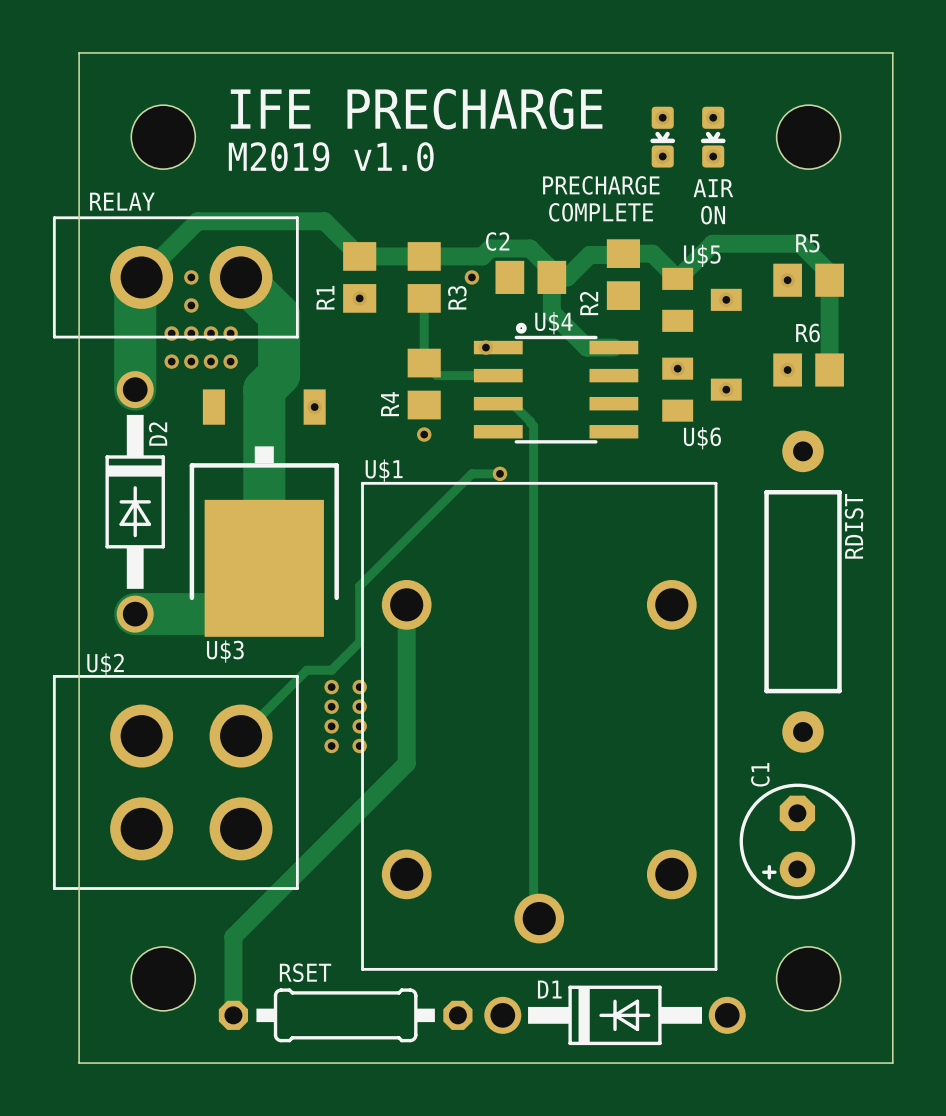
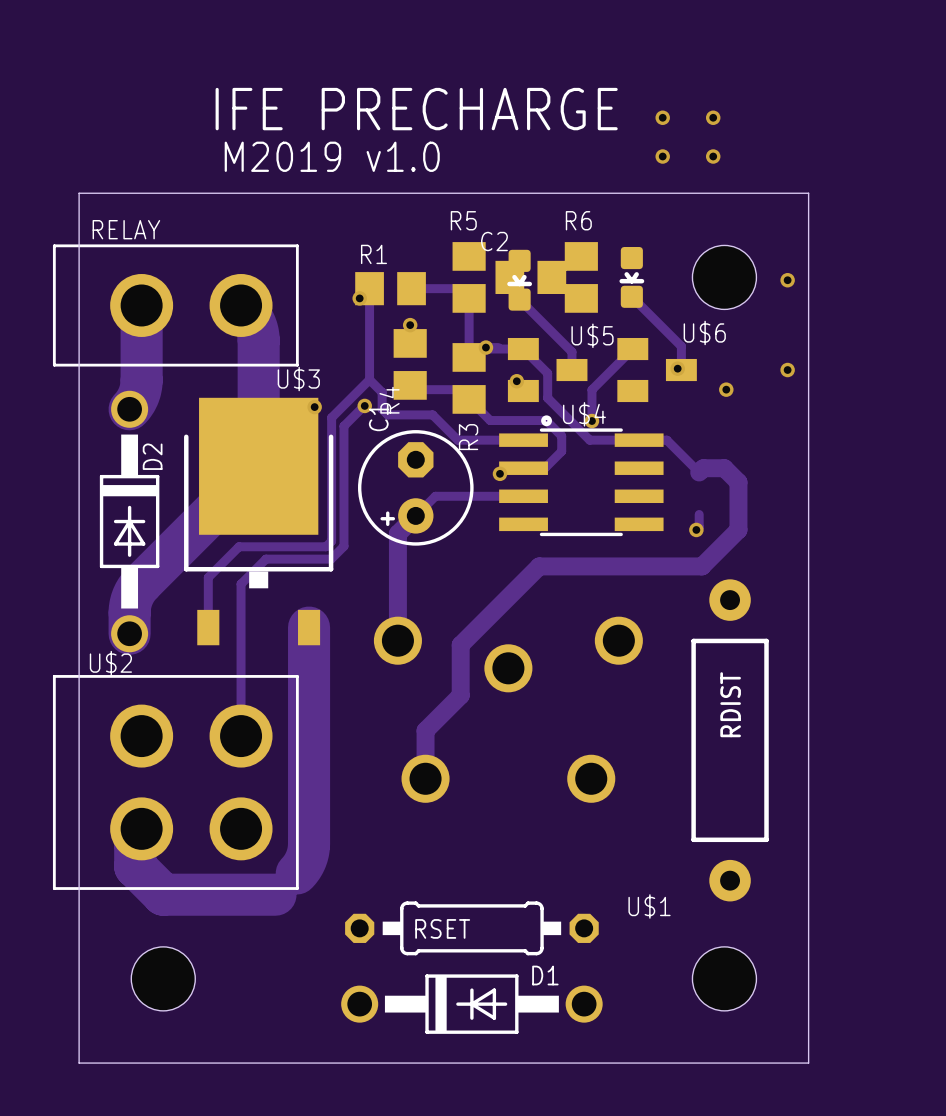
hole: (163, 137) -> none
part: (662, 137) -> none
part: (713, 137) -> none
hole position: (808, 137) -> (724, 277)
text: PRECHARGE (601, 185) -> none
text: AIR (713, 188) -> none
board edge: (79, 193) (79, 52) (892, 52) (892, 1063) (808, 1063) -> (79, 193) (808, 193) (808, 1063)
text: COMPLETE (601, 212) -> none
text: ON (713, 215) -> none
U$5 name position: U$5 (702, 255) -> U$5 (592, 335)
R2: (623, 274) -> none
RELAY position: (175, 277) -> (175, 305)
via: (191, 277) -> none
track: (241, 277) (279, 315) (279, 374) (264, 389) (264, 568) (246, 614) (135, 614) -> none
R1 rotation: 0° (359, 277) -> 90° clockwise (390, 288)
R3 position: (424, 277) -> (469, 378)
via: (471, 277) -> none
track: (551, 277) (551, 312) (586, 347) (613, 347) -> none
track: (551, 277) (547, 273) (547, 266) (529, 248) (490, 248) (482, 256) (359, 256) (324, 221) (197, 221) (135, 283) (135, 389) -> none
track: (551, 277) (567, 277) (589, 254) (652, 253) (677, 278) (712, 243) (800, 243) (829, 273) (829, 370) -> none
part: none -> (631, 277)
part: none -> (519, 280)
R5 rotation: 0° (808, 280) -> 90° clockwise (469, 277)
R5 position: (808, 280) -> (469, 277)
track: none -> (369, 288) (369, 379)
track: none -> (411, 288) (459, 288) (469, 298) (469, 357) (477, 349) (523, 349) (547, 373) (547, 398) (589, 440) (666, 440) (699, 472) (703, 468) (724, 468) (738, 482) (738, 529) (701, 566) (539, 566) (460, 644) (460, 695) (425, 730) (425, 778)
track: none -> (631, 296) (681, 346) (681, 370)
R3 name position: R3 (457, 297) -> R3 (468, 437)
track: (424, 298) (424, 363) (436, 375) (498, 375) -> none
track: none -> (519, 299) (571, 351) (571, 370)
U$5 position: (701, 299) -> (547, 370)
track: none -> (141, 305) (141, 385) (138, 395) (129, 409)
via: (191, 305) -> none
track: none -> (241, 305) (253, 320) (258, 336) (258, 466) (139, 586) (130, 604) (129, 633)
via: none -> (410, 325)
via: (171, 333) -> none
via: (191, 333) -> none
via: (210, 333) -> none
via: (230, 333) -> none
track: none -> (632, 349) (591, 389) (591, 421)
via: (171, 361) -> none
via: (191, 361) -> none
via: (210, 361) -> none
via: (230, 361) -> none
R6 rotation: 0° (808, 370) -> 90° clockwise (581, 277)
R6 position: (808, 370) -> (581, 277)
track: none -> (369, 379) (331, 417) (331, 541) (326, 546) (239, 546) (208, 577) (208, 627)
track: none -> (369, 379) (382, 392) (382, 409) (387, 414) (432, 414) (457, 440) (523, 440)
via: none -> (516, 381)
U$4 position: (556, 383) -> (581, 475)
R4 position: (424, 384) -> (410, 364)
track: none -> (410, 385) (414, 389) (459, 389) (490, 420) (546, 420) (561, 436) (561, 451) (544, 468) (523, 468)
U$6 position: (701, 389) -> (657, 370)
track: (498, 403) (512, 403) (533, 426) (533, 912) (539, 918) -> none
via: none -> (364, 405)
via: none -> (591, 421)
via: (424, 434) -> none
U$6 name position: U$6 (702, 438) -> U$6 (704, 332)
U$1 name position: U$1 (384, 470) -> U$1 (649, 906)
track: (499, 473) (471, 473) (359, 586) (359, 642) (331, 670) (306, 670) (241, 736) -> (364, 405) (343, 426) (343, 546) (331, 559) (265, 559) (241, 584) (241, 736)
U$1 footprint: [361, 481, 718, 971] -> [373, 616, 643, 803]
track: none -> (523, 496) (435, 496) (397, 533) (397, 640)
D2 position: (135, 501) -> (129, 521)
U$3 rotation: 0° (264, 513) -> 180° (258, 521)
track: none -> (699, 514) (699, 527) (696, 529)
RDIST name position: RDIST (854, 526) -> RDIST (730, 704)
via: none -> (696, 529)
RDIST position: (803, 591) -> (730, 740)
track: (406, 604) (406, 763) (296, 873) -> (309, 627) (308, 847) (304, 863) (296, 873)
via: (331, 687) -> none
via: (359, 687) -> none
via: (331, 706) -> none
via: (359, 706) -> none
via: (331, 726) -> none
via: (359, 726) -> none
via: (331, 745) -> none
via: (359, 745) -> none
C1 position: (797, 841) -> (415, 487)
track: (275, 894) (233, 936) (233, 1015) -> (275, 894) (163, 894) (135, 866) (135, 841) (141, 828)
RSET name position: RSET (305, 972) -> RSET (442, 928)
hole position: (808, 978) -> (724, 978)
D1 name position: D1 (549, 989) -> D1 (545, 975)
RSET position: (345, 1015) -> (471, 928)
D1 position: (615, 1015) -> (471, 1004)

